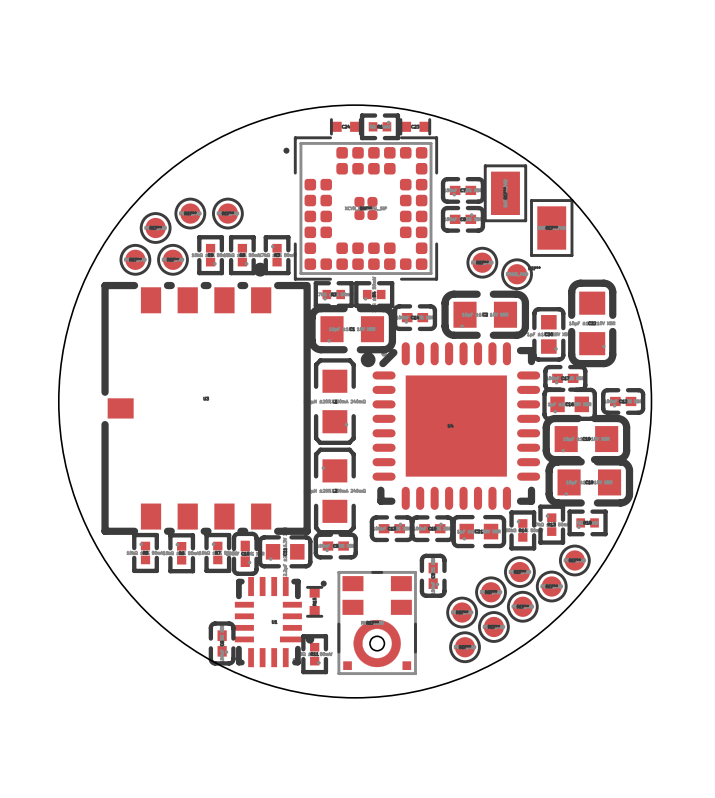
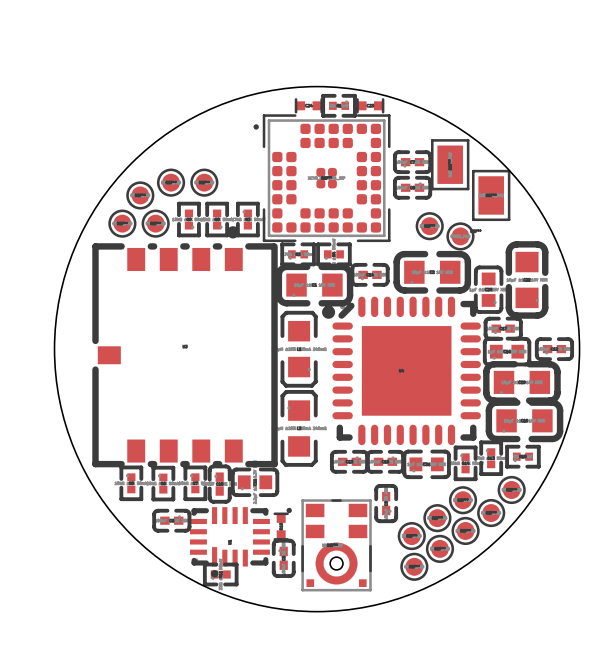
part rotation: 0° (335, 546) -> 90° clockwise (283, 558)
part position: (335, 546) -> (283, 558)
part rotation: 0° (245, 553) -> 180° (219, 484)
part rotation: 0° (274, 622) -> 90° clockwise (229, 542)
part rotation: 0° (222, 643) -> 90° counterclockwise (171, 520)
part position: (222, 643) -> (171, 520)
part rotation: 0° (314, 654) -> 90° clockwise (220, 574)
part position: (314, 654) -> (220, 574)

